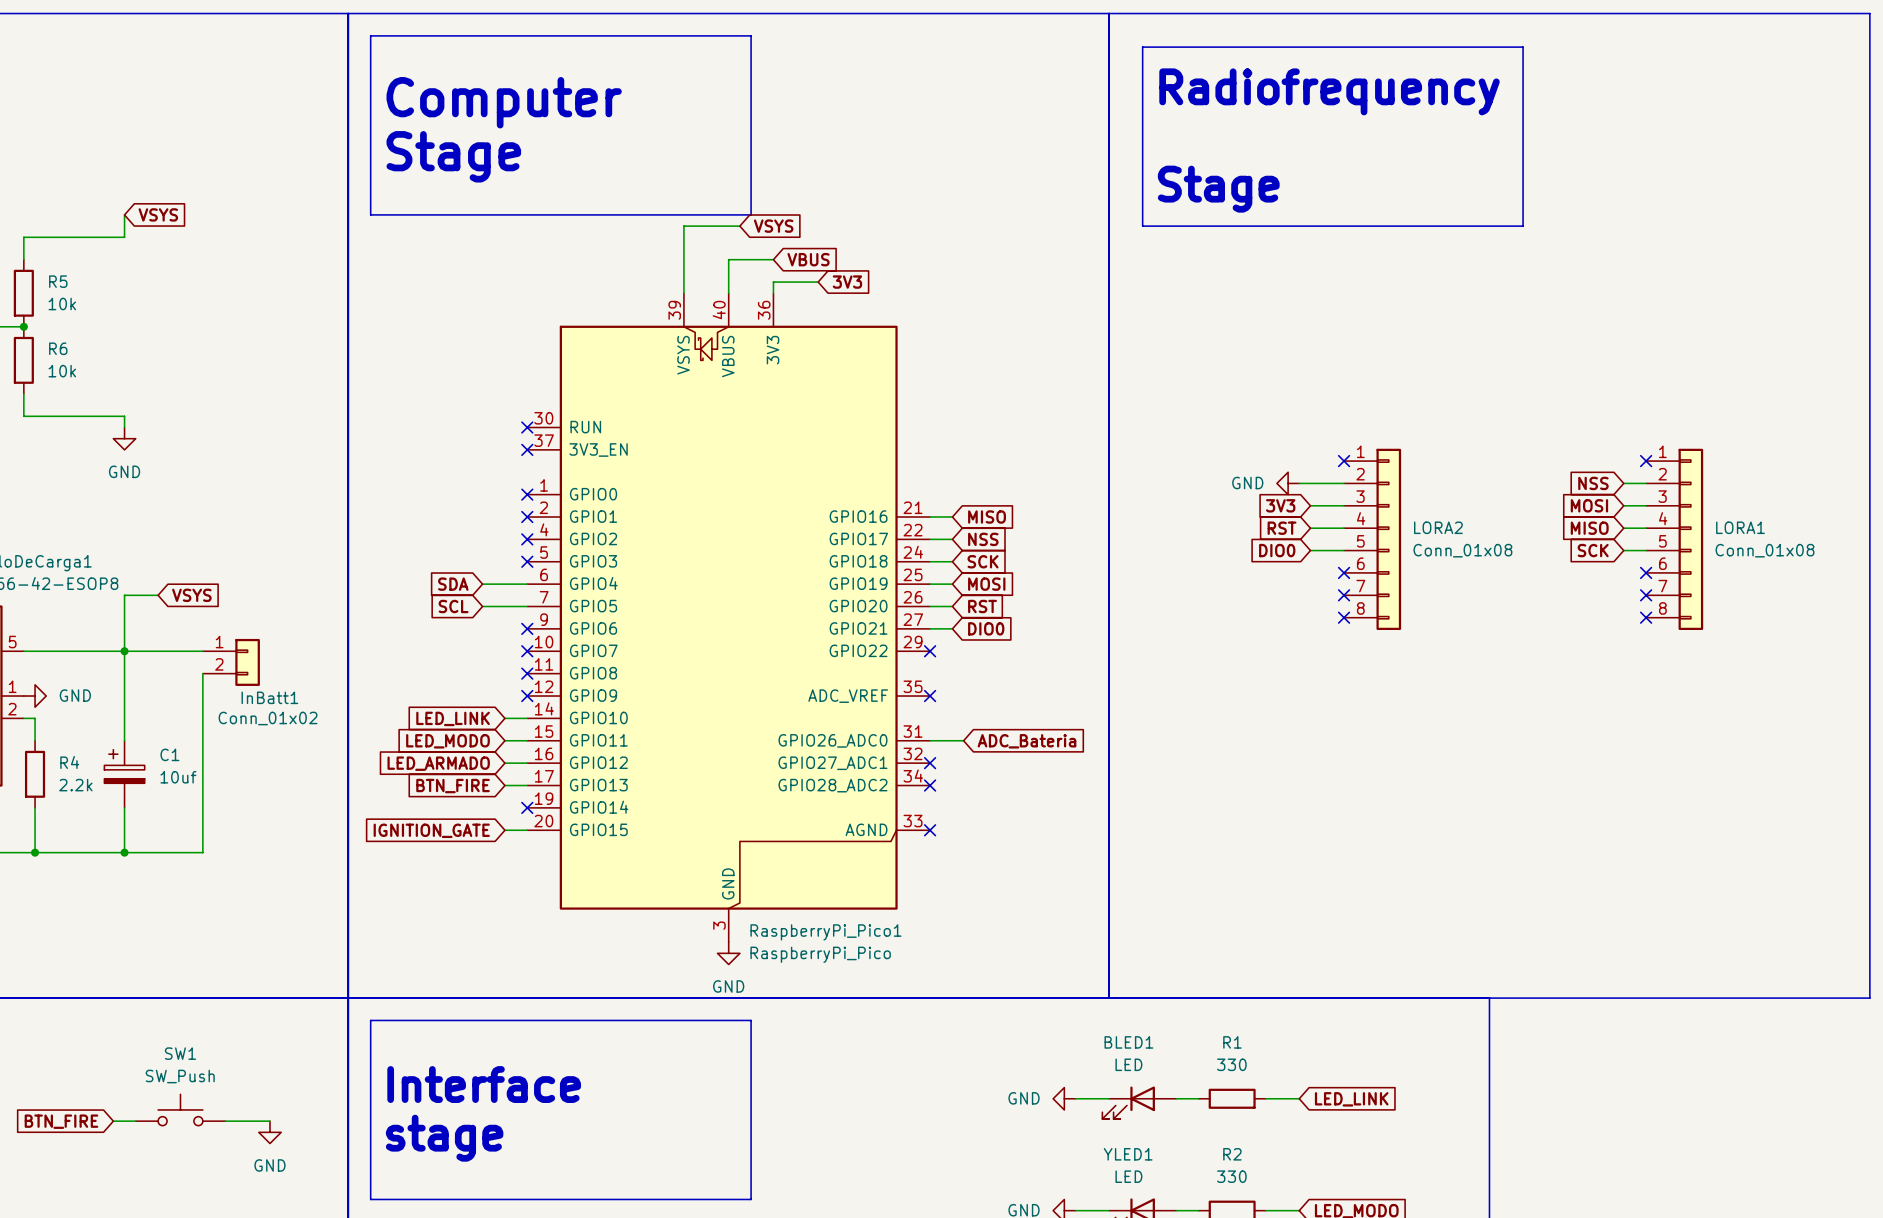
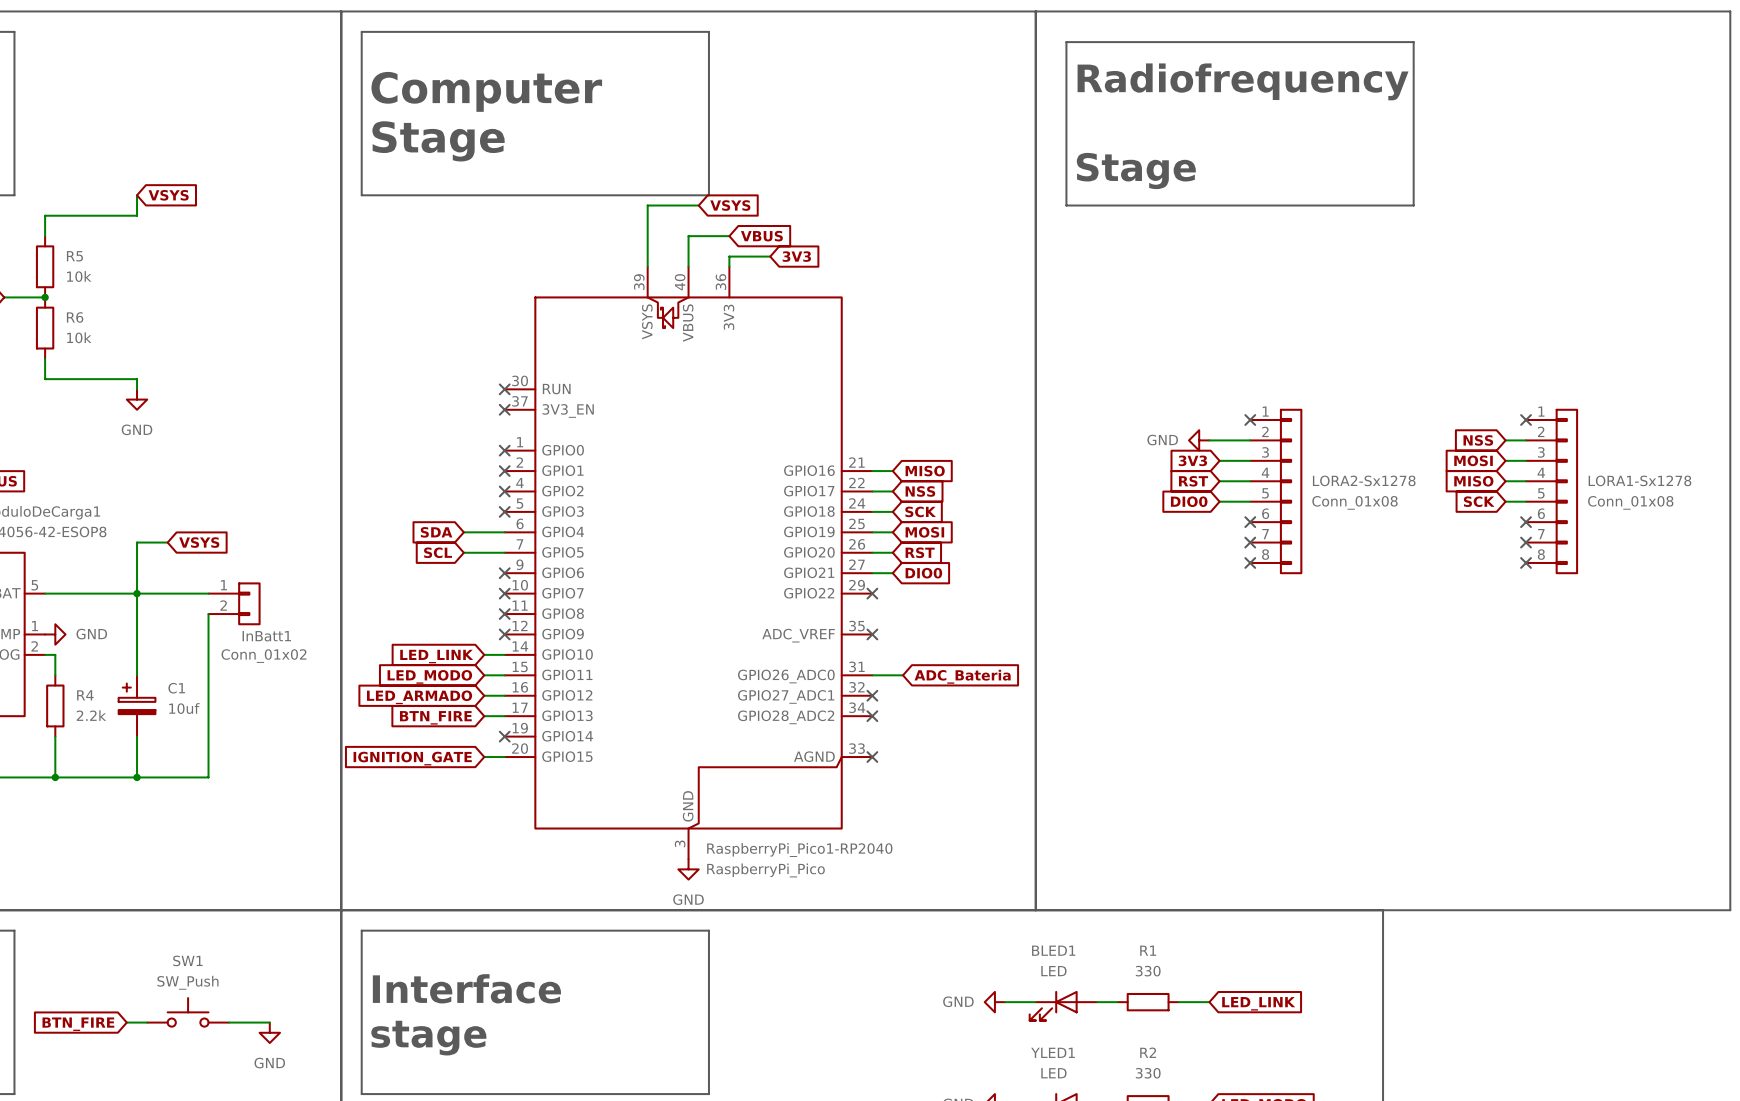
LORA2 name: LORA2 (1438, 527) -> LORA2-Sx1278 (1364, 480)
LORA1 name: LORA1 (1740, 527) -> LORA1-Sx1278 (1639, 480)
RaspberryPi_Pico1 name: RaspberryPi_Pico1 (825, 932) -> RaspberryPi_Pico1-RP2040 (799, 850)

